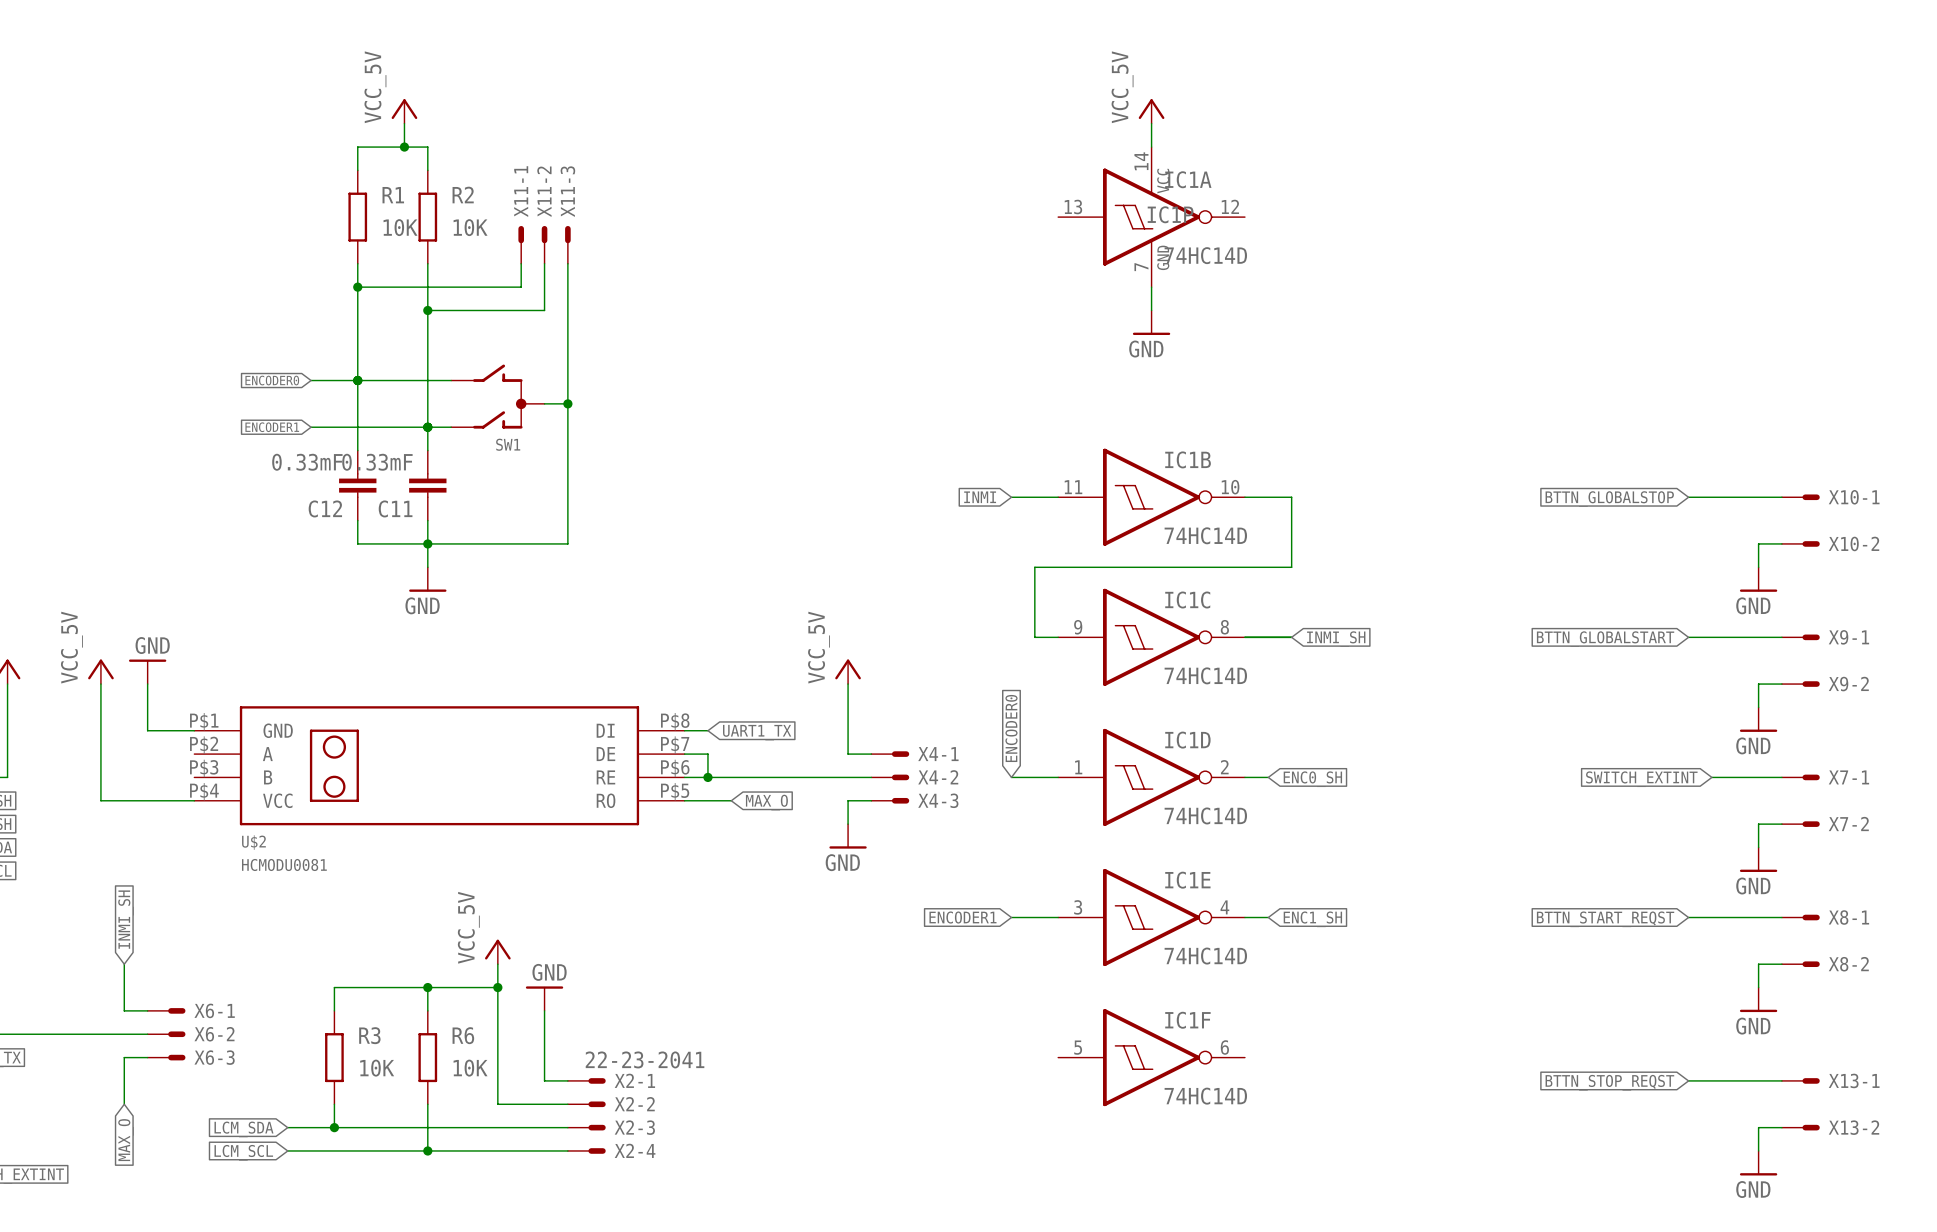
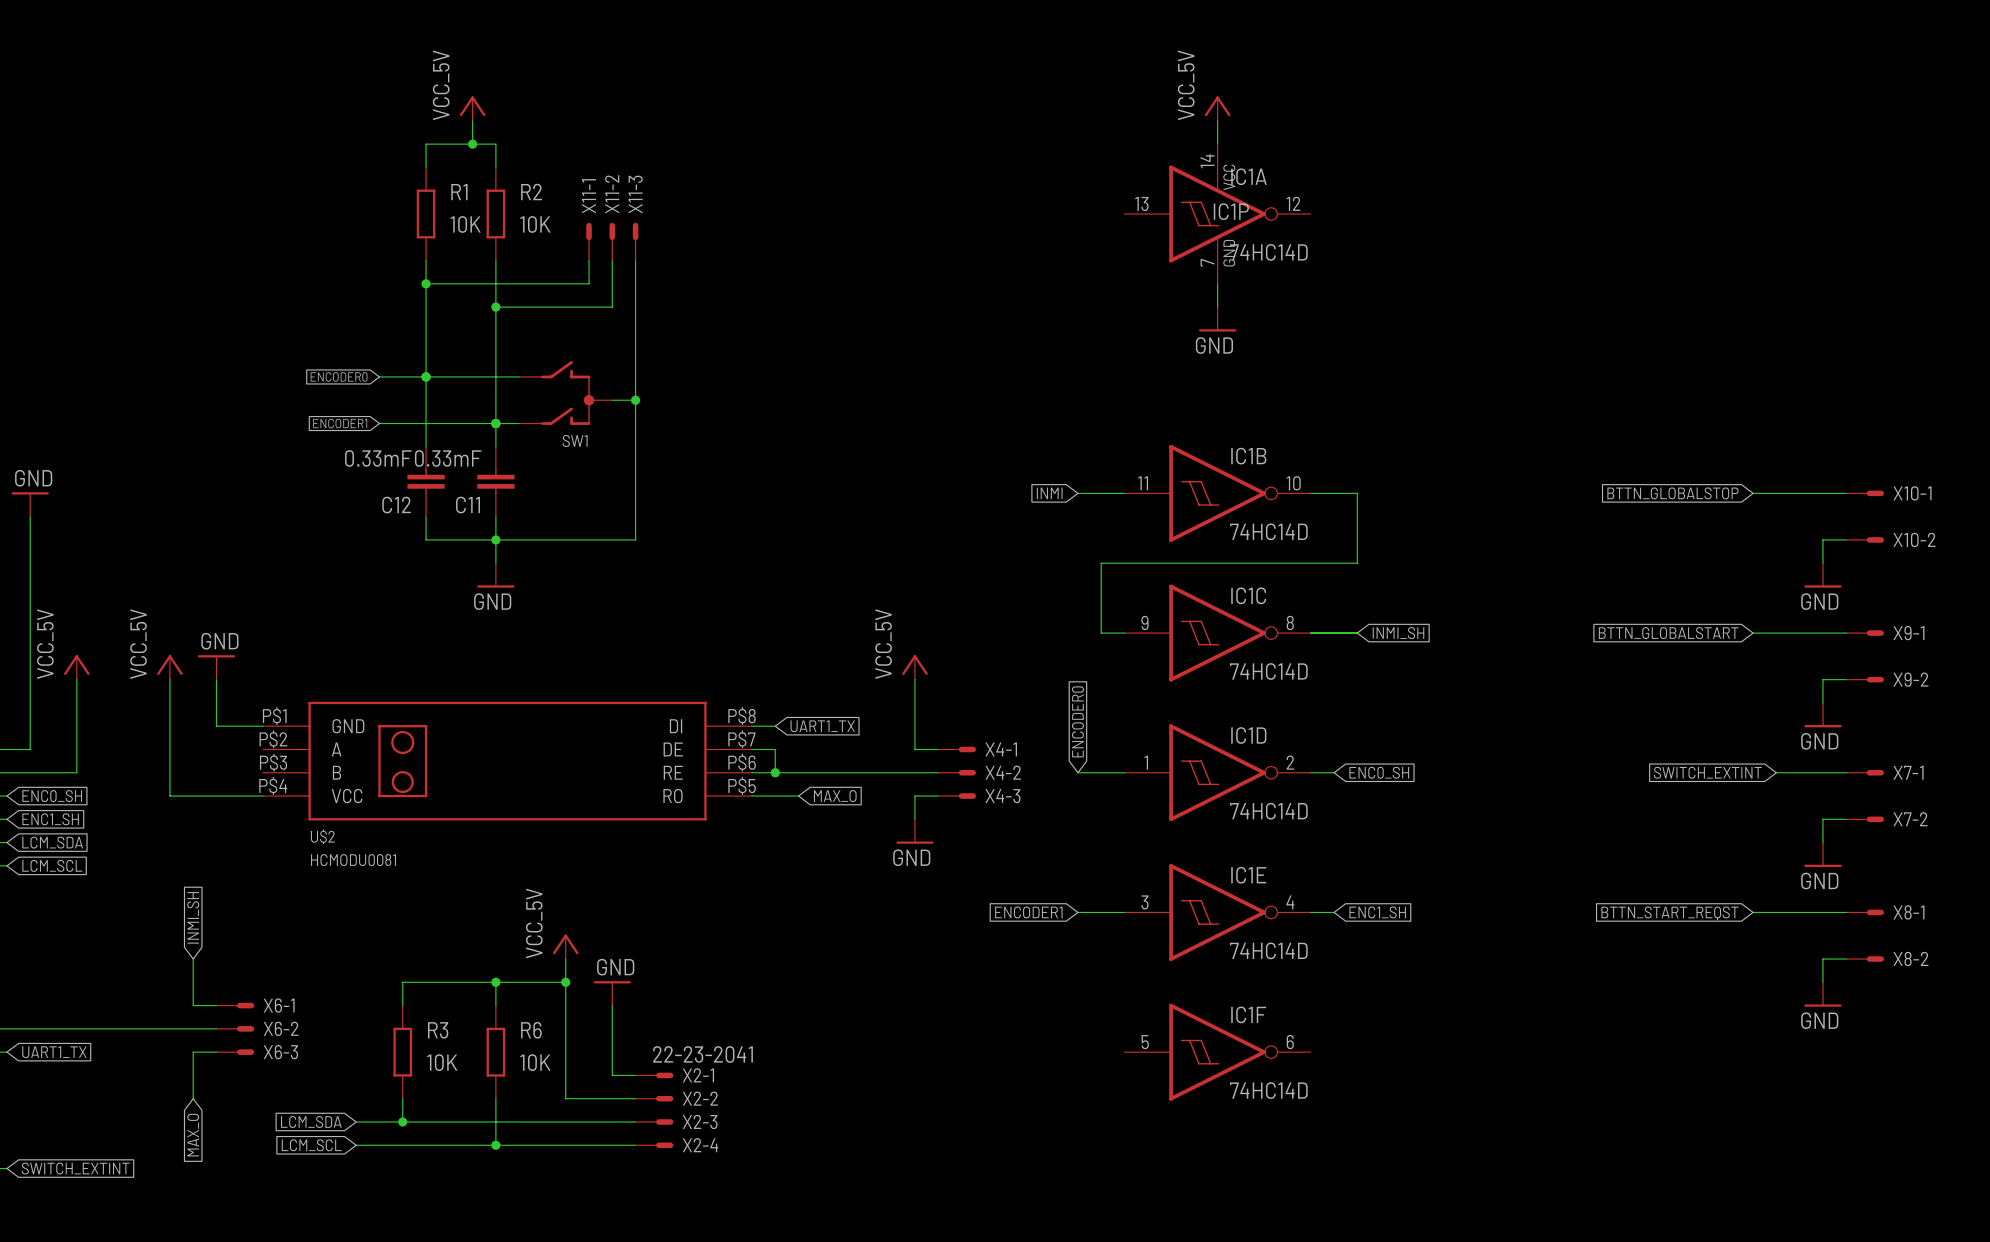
wire: (1688, 1080) (1781, 1080) -> none
X13-1: (1800, 1080) -> none
global label: BTTN_STOP_REQST (1609, 1082) -> none
wire: (1781, 1127) (1758, 1127) (1758, 1150) -> none
X13-2: (1800, 1127) -> none
power symbol: GND (1758, 1163) -> none

